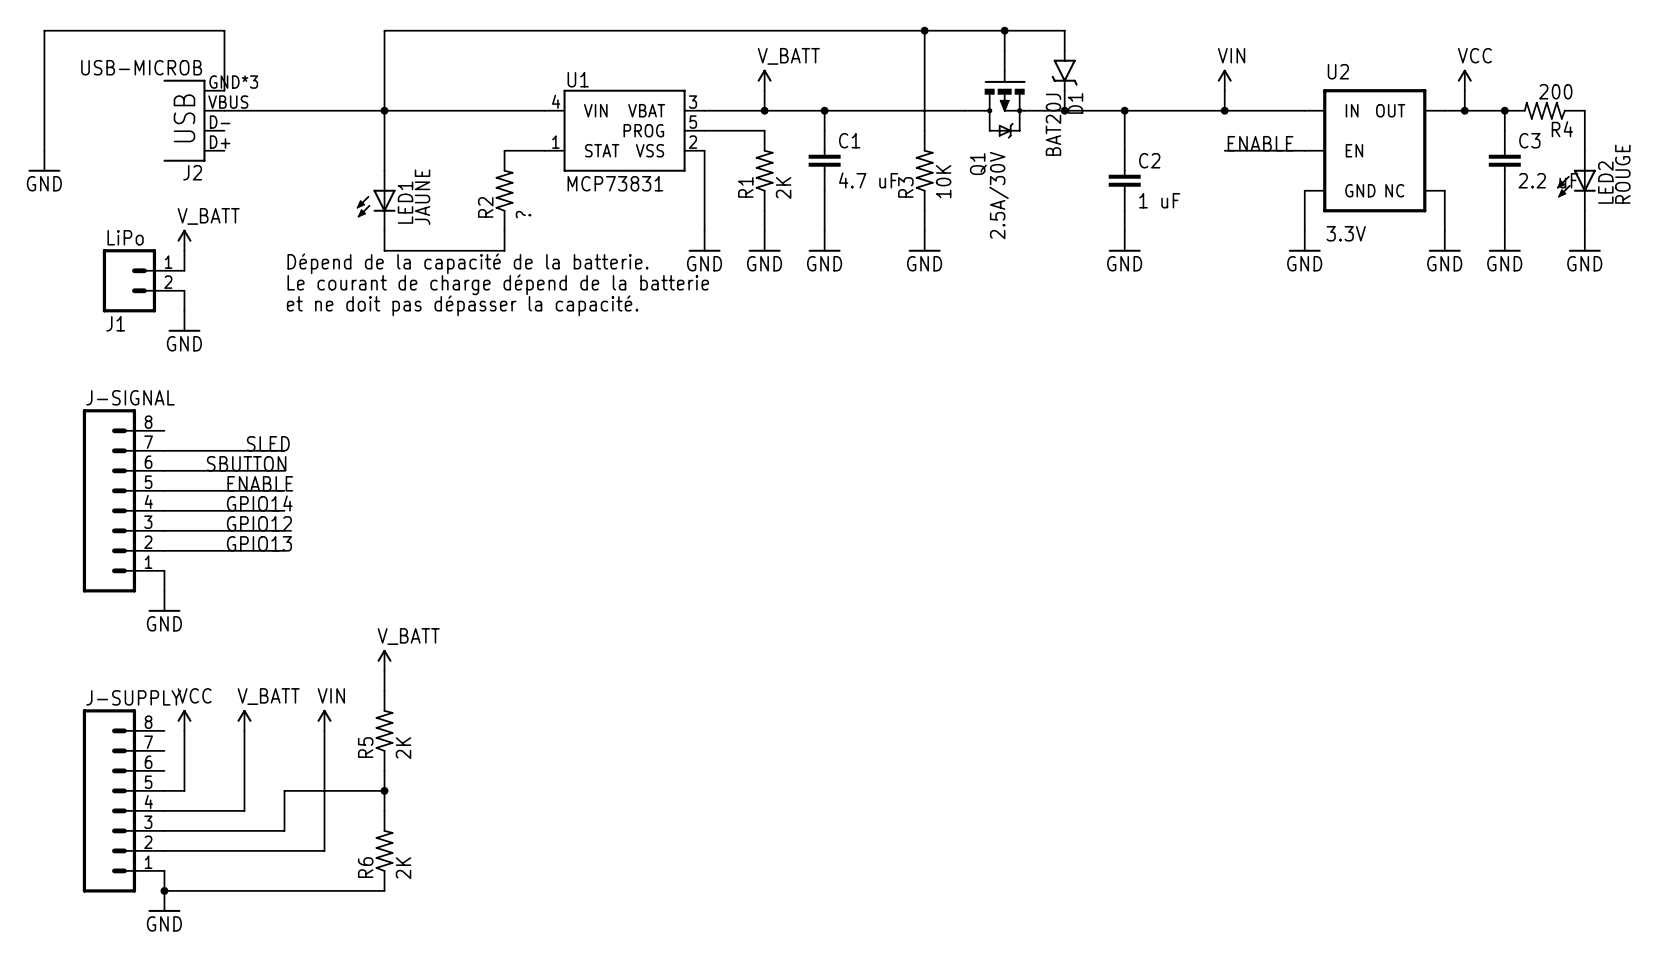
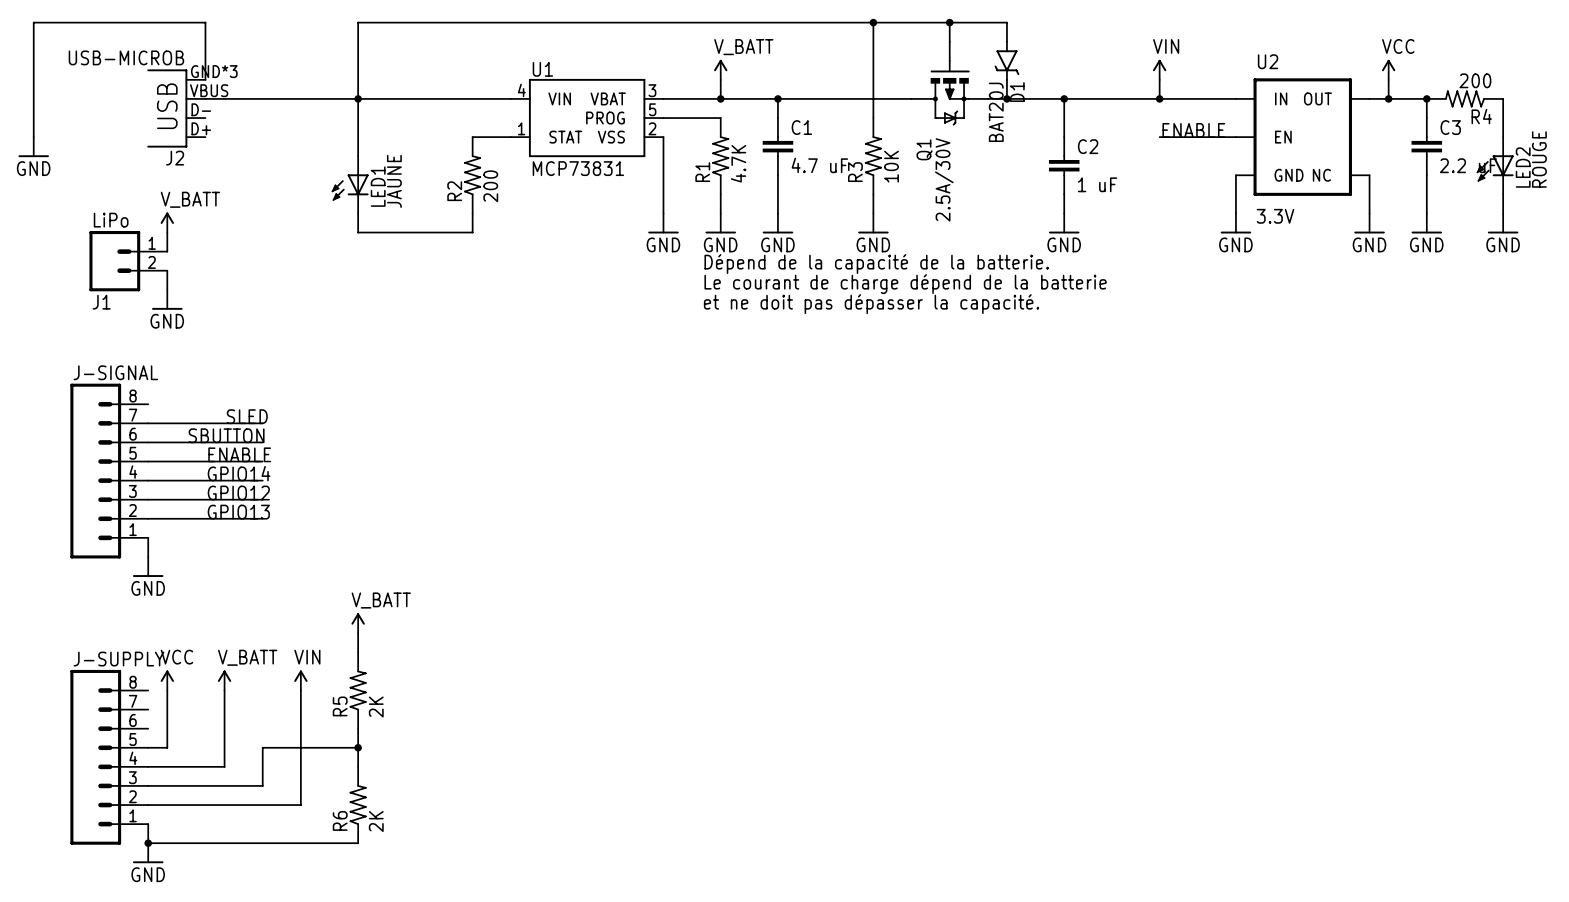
R1 value: 2K (783, 188) -> 4.7K (738, 163)
R2 value: ? (523, 214) -> 200 (490, 186)
text: Dépend de la capacité de la batterie. (467, 263) -> none
text: none -> Dépend de la capacité de la batterie. (876, 264)
text: Le courant de charge dépend de la batterie (498, 284) -> none
text: none -> Le courant de charge dépend de la batterie (905, 284)
text: et ne doit pas dépasser la capacité. (462, 305) -> none
text: none -> et ne doit pas dépasser la capacité. (871, 304)

